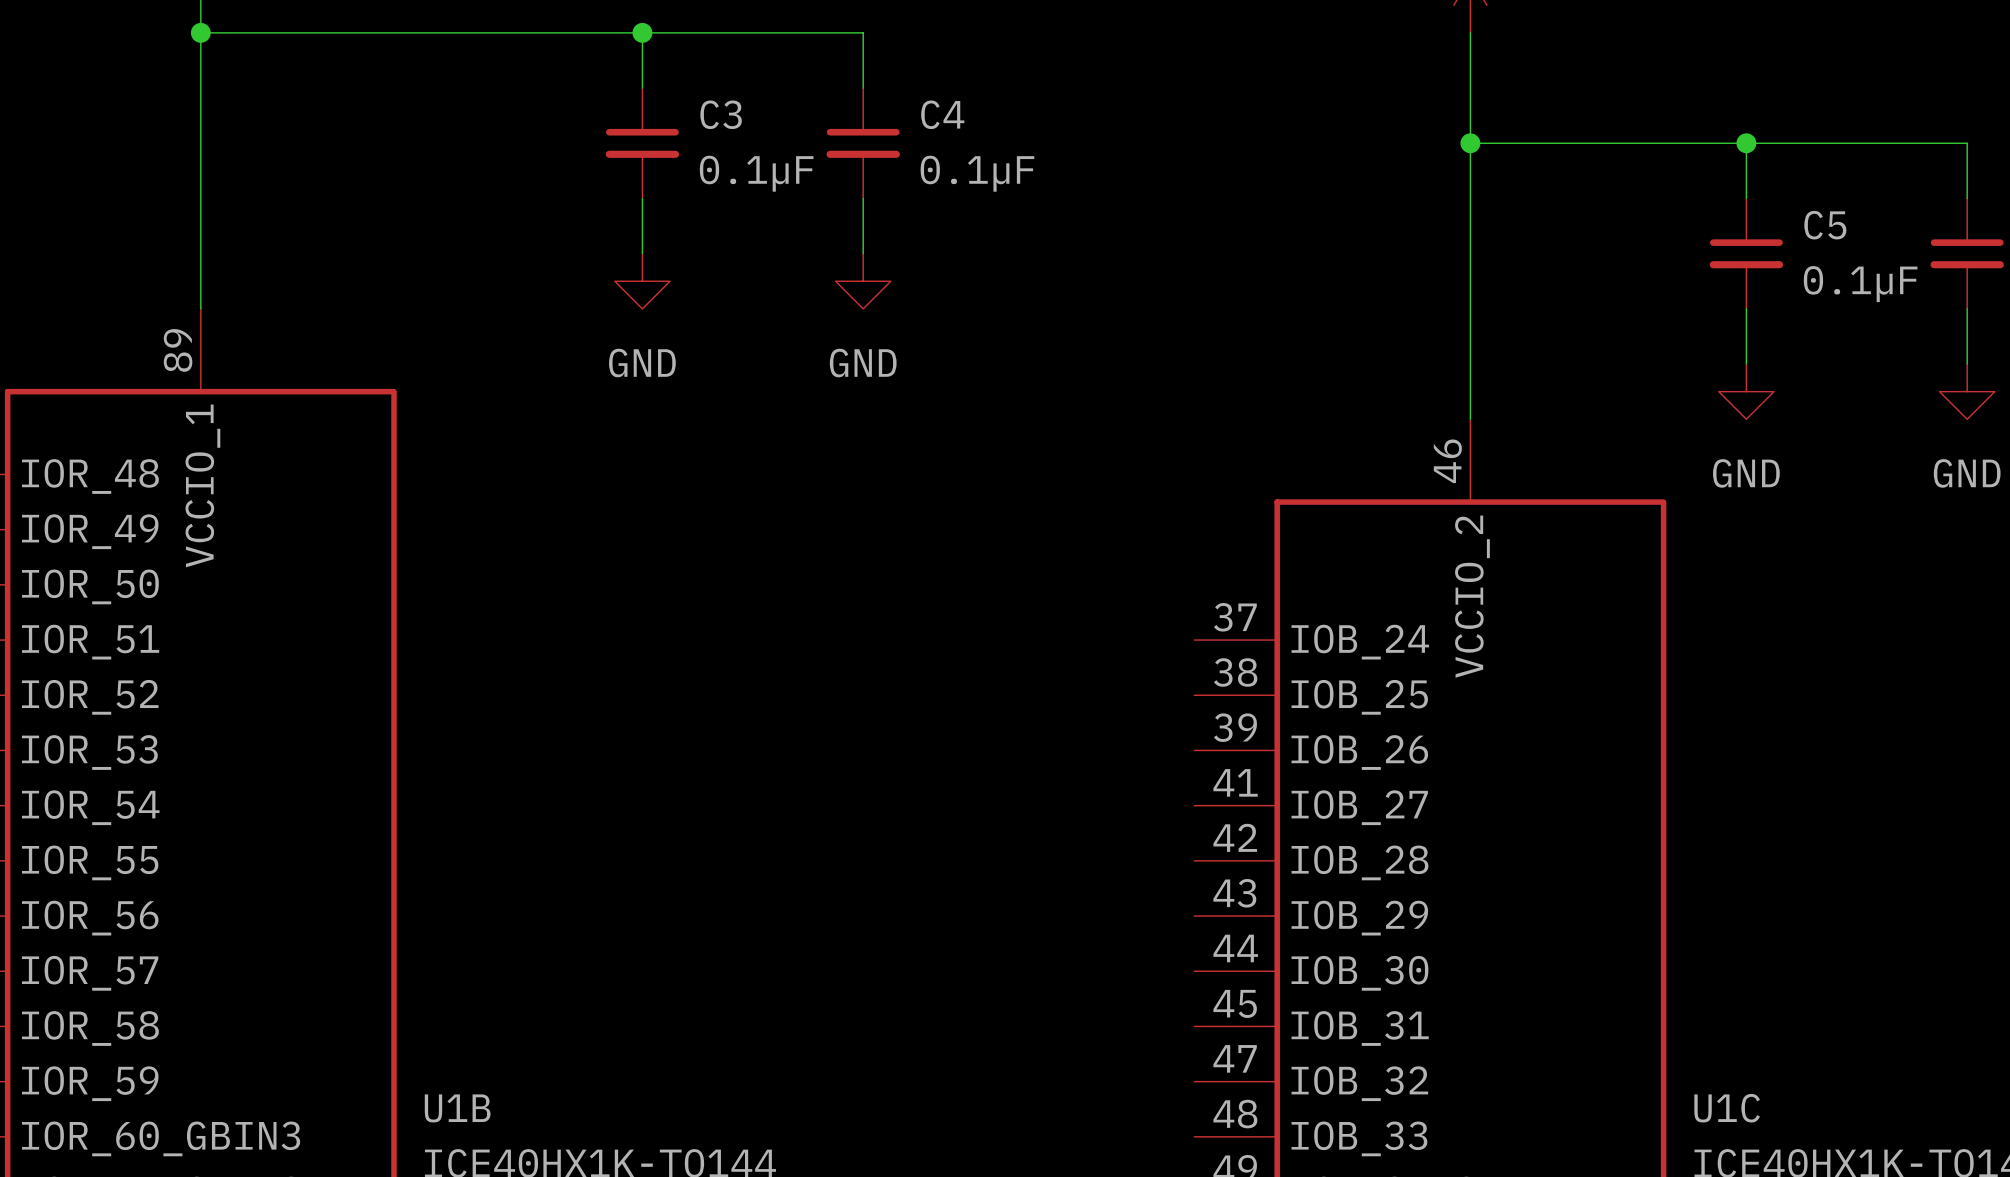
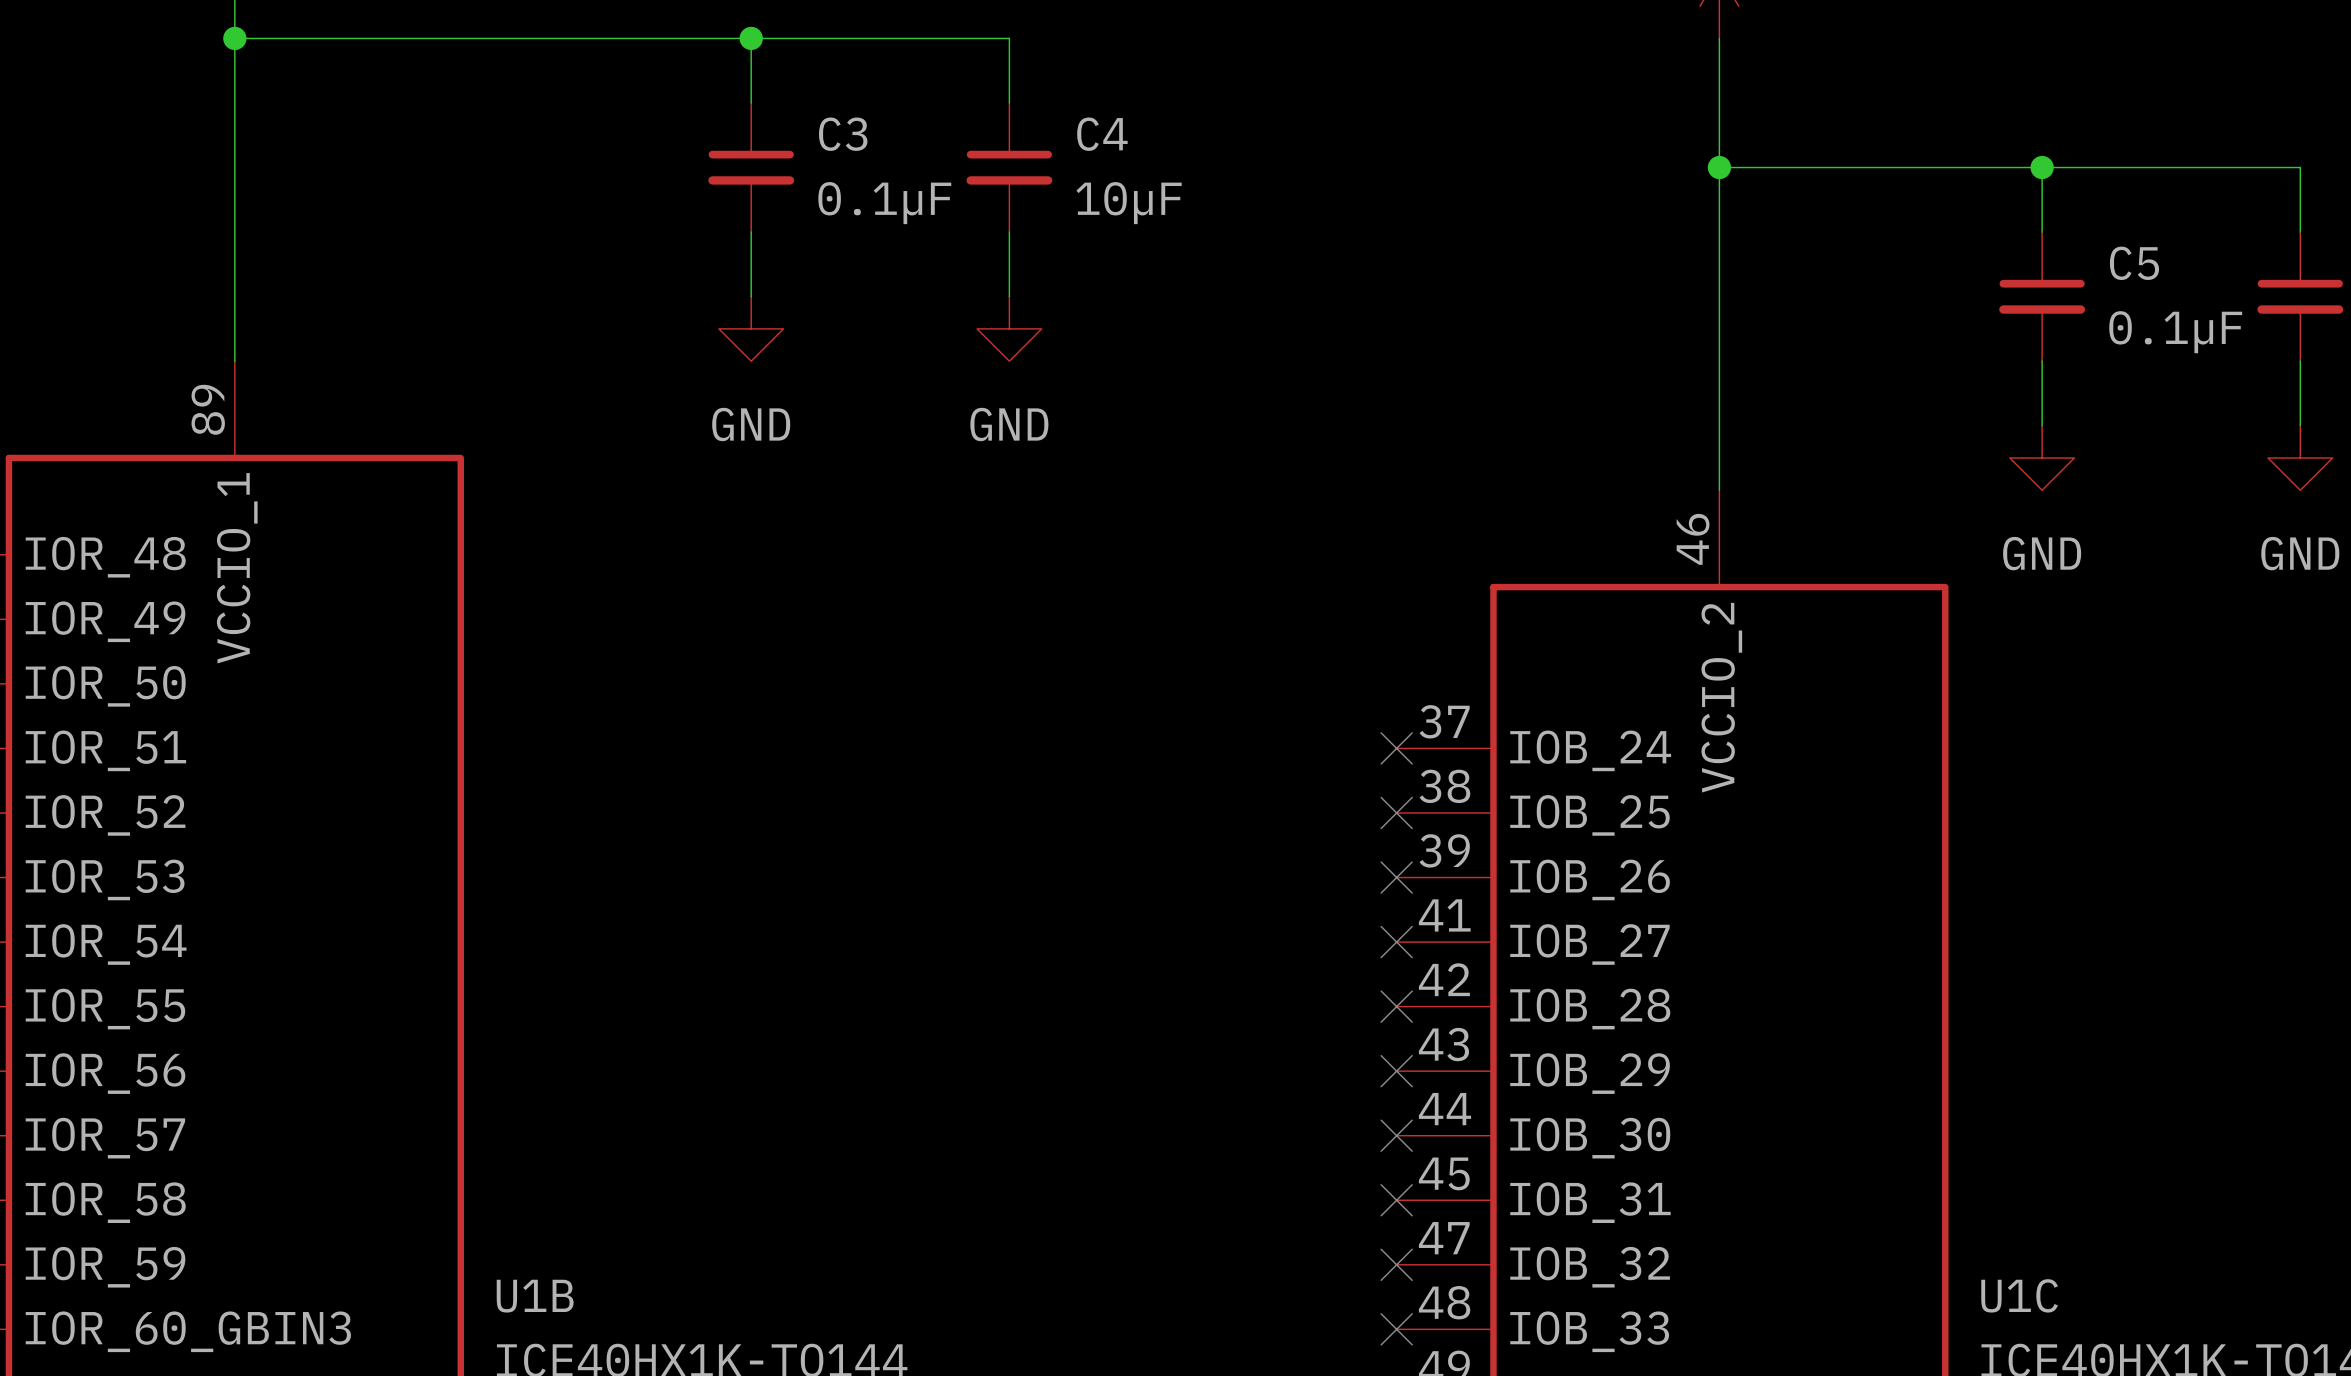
C4 value: 0.1µF (977, 173) -> 10µF (1129, 203)
no-connect mark: none -> (1396, 748)
no-connect mark: none -> (1396, 812)
no-connect mark: none -> (1396, 877)
no-connect mark: none -> (1396, 942)
no-connect mark: none -> (1396, 1006)
no-connect mark: none -> (1396, 1071)
no-connect mark: none -> (1396, 1135)
no-connect mark: none -> (1396, 1200)
no-connect mark: none -> (1396, 1264)
no-connect mark: none -> (1396, 1329)

